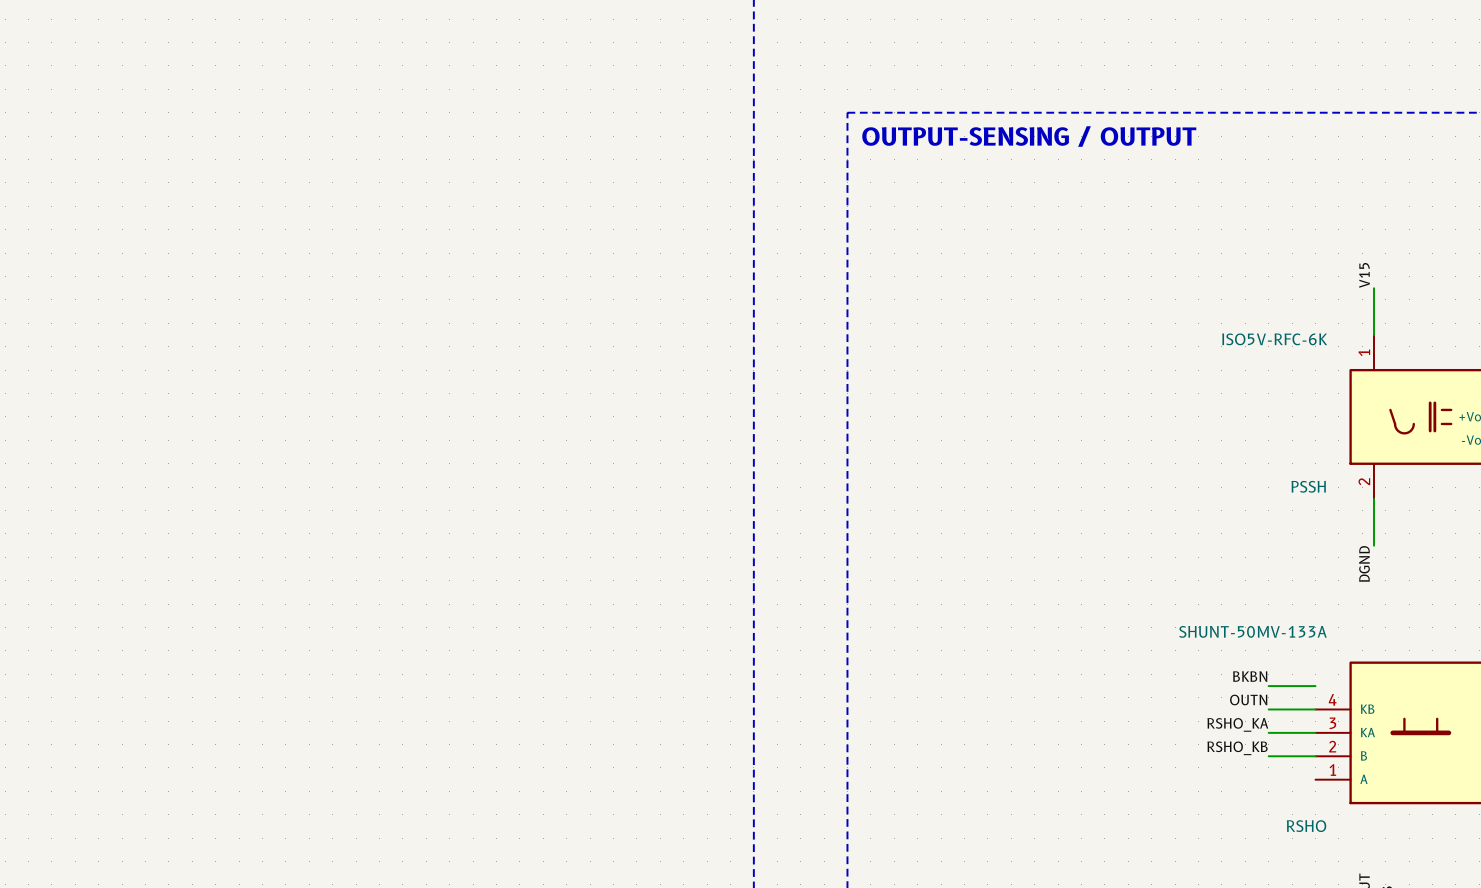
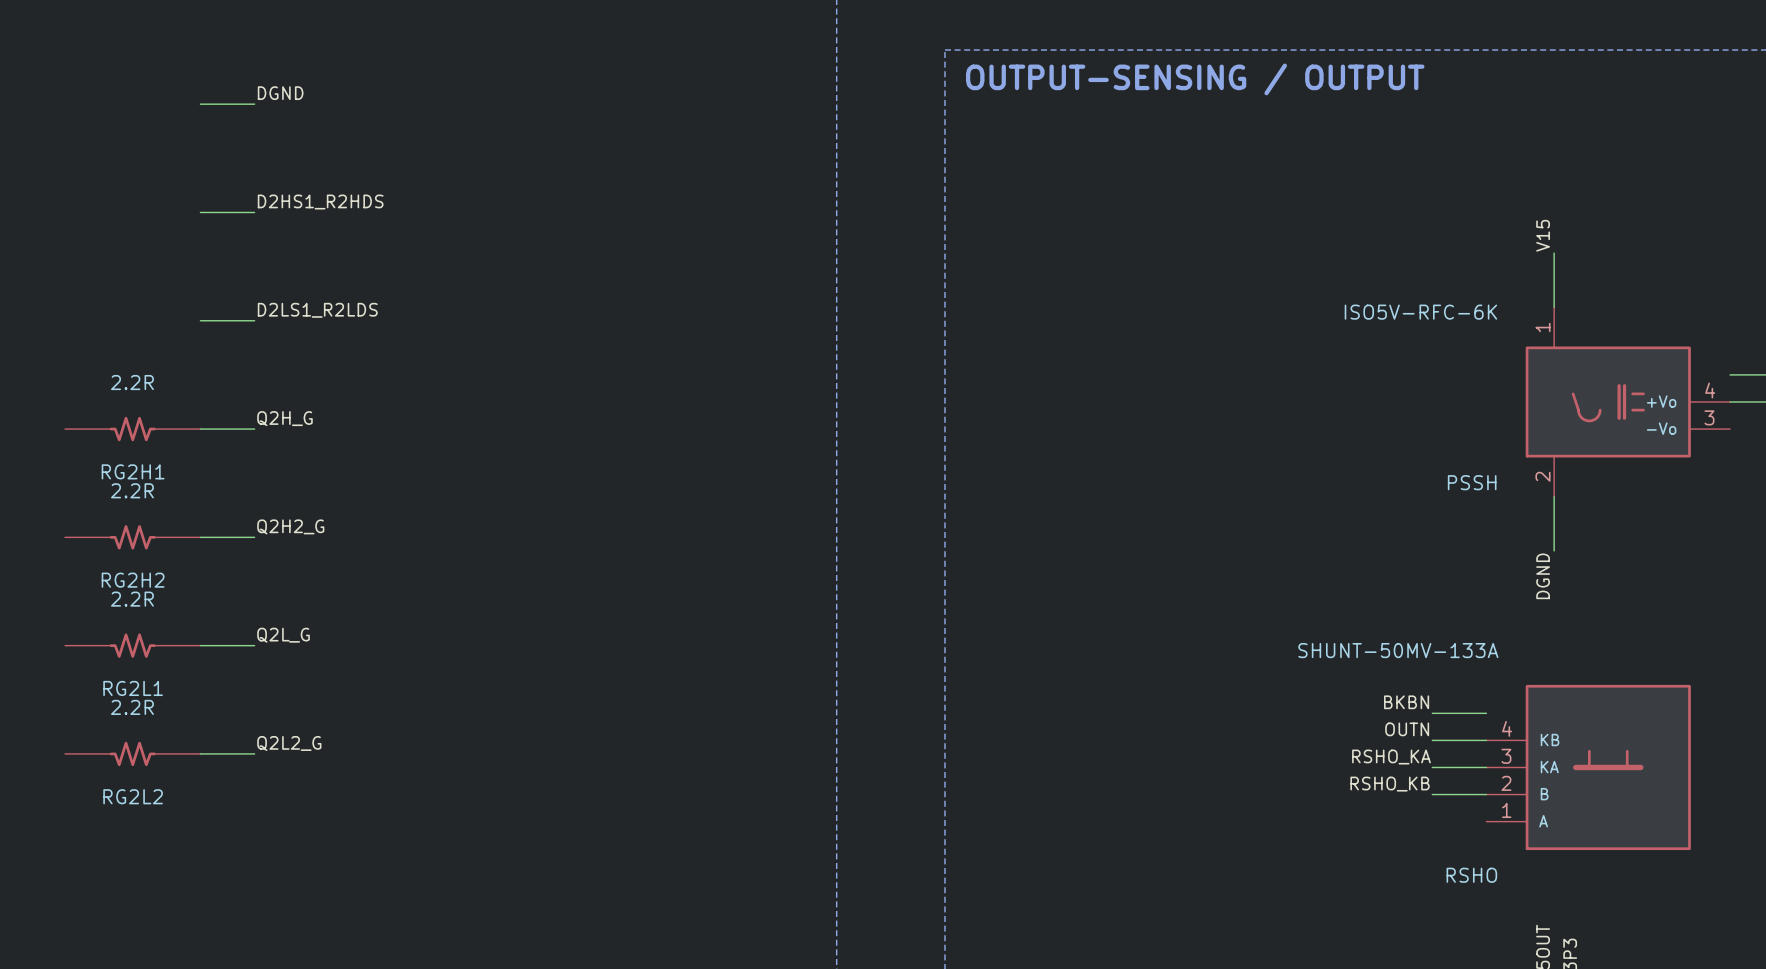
label: none -> DGND (280, 93)
wire: none -> (200, 104) (254, 104)
label: none -> D2HS1_R2HDS (320, 202)
wire: none -> (200, 212) (254, 212)
label: none -> D2LS1_R2LDS (317, 310)
wire: none -> (200, 320) (254, 320)
label: none -> Q2H_G (284, 418)
RG2H1: none -> 2.2R (132, 429)
wire: none -> (200, 429) (254, 429)
label: none -> Q2H2_G (290, 526)
RG2H2: none -> 2.2R (132, 537)
wire: none -> (200, 537) (254, 537)
label: none -> Q2L_G (283, 635)
RG2L1: none -> 2.2R (132, 645)
wire: none -> (200, 645) (254, 645)
label: none -> Q2L2_G (289, 743)
RG2L2: none -> 2.2R (132, 753)
wire: none -> (200, 753) (254, 753)

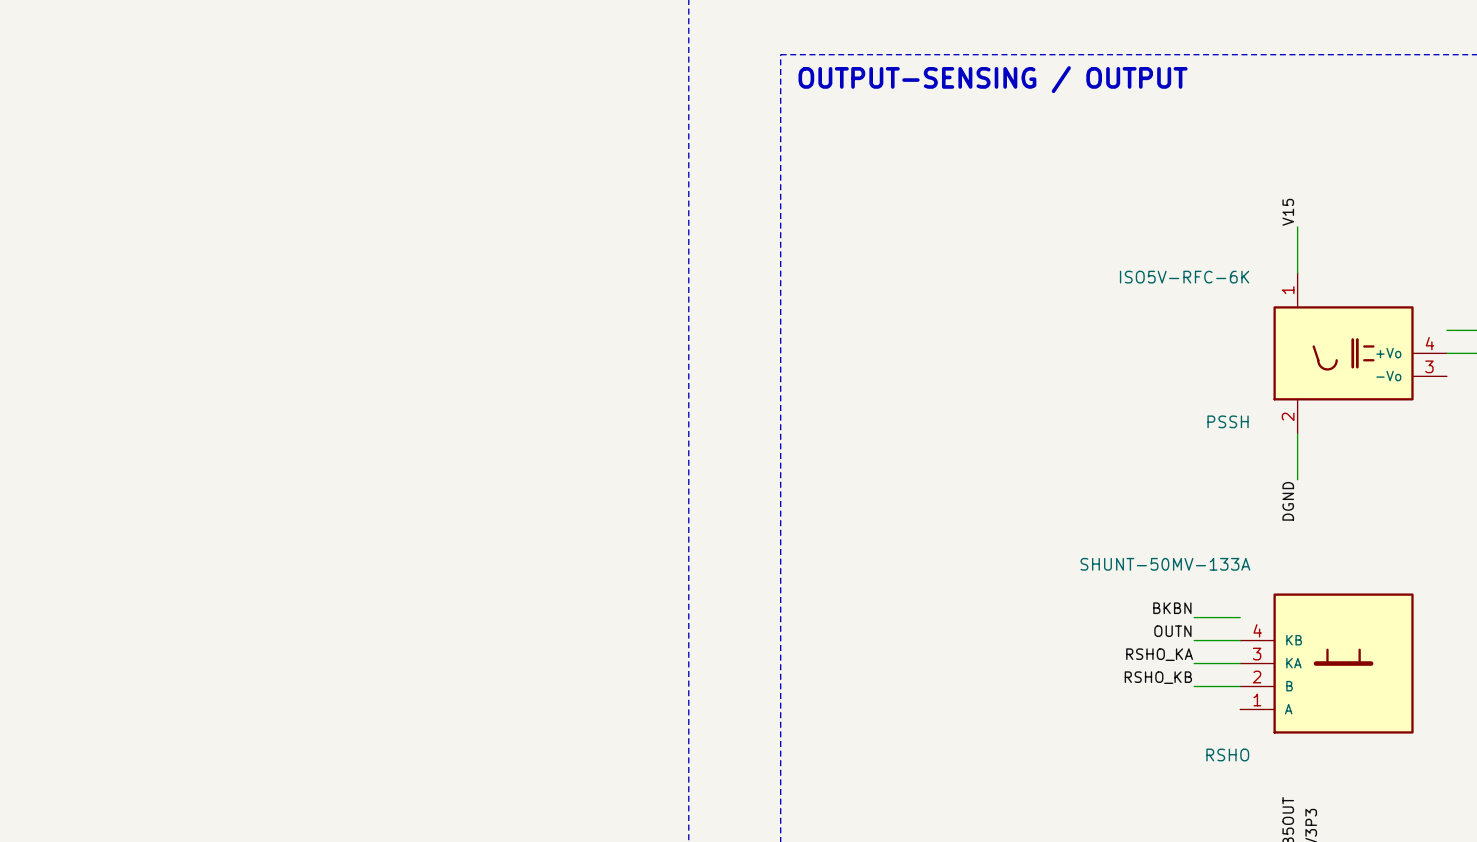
label: DGND (280, 93) -> none
wire: (200, 104) (254, 104) -> none
label: D2HS1_R2HDS (320, 202) -> none
wire: (200, 212) (254, 212) -> none
label: D2LS1_R2LDS (317, 310) -> none
wire: (200, 320) (254, 320) -> none
label: Q2H_G (284, 418) -> none
RG2H1: 2.2R (132, 429) -> none
wire: (200, 429) (254, 429) -> none
label: Q2H2_G (290, 526) -> none
RG2H2: 2.2R (132, 537) -> none
wire: (200, 537) (254, 537) -> none
label: Q2L_G (283, 635) -> none
RG2L1: 2.2R (132, 645) -> none
wire: (200, 645) (254, 645) -> none
label: Q2L2_G (289, 743) -> none
RG2L2: 2.2R (132, 753) -> none
wire: (200, 753) (254, 753) -> none

